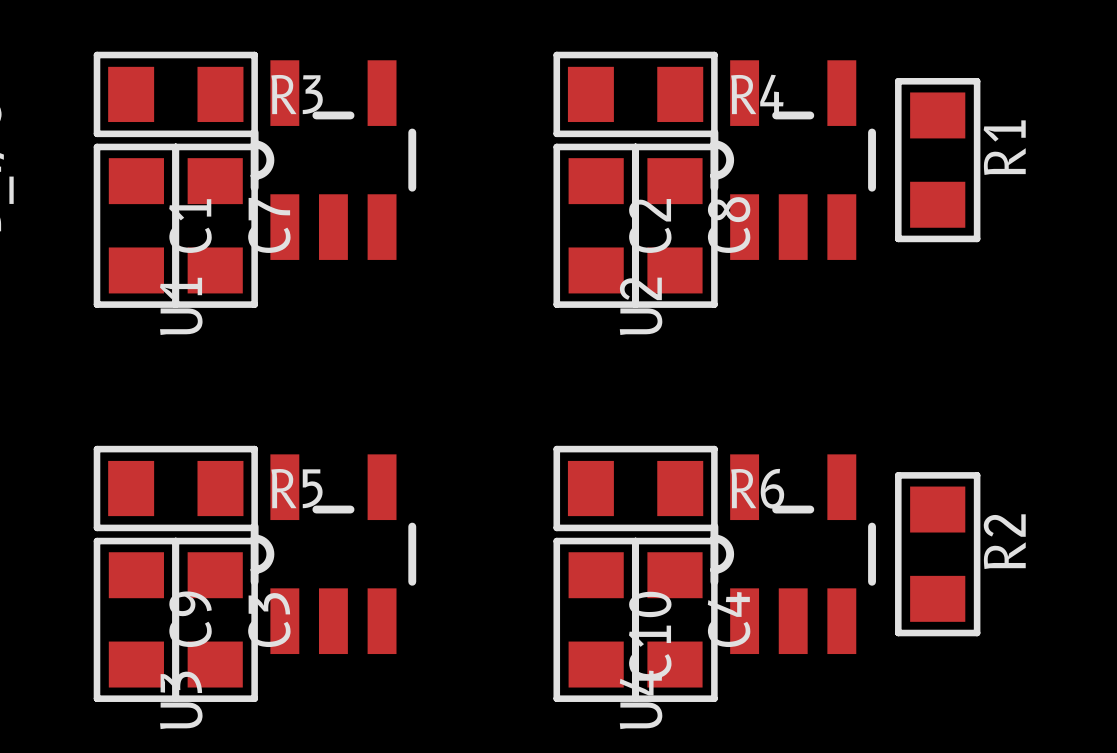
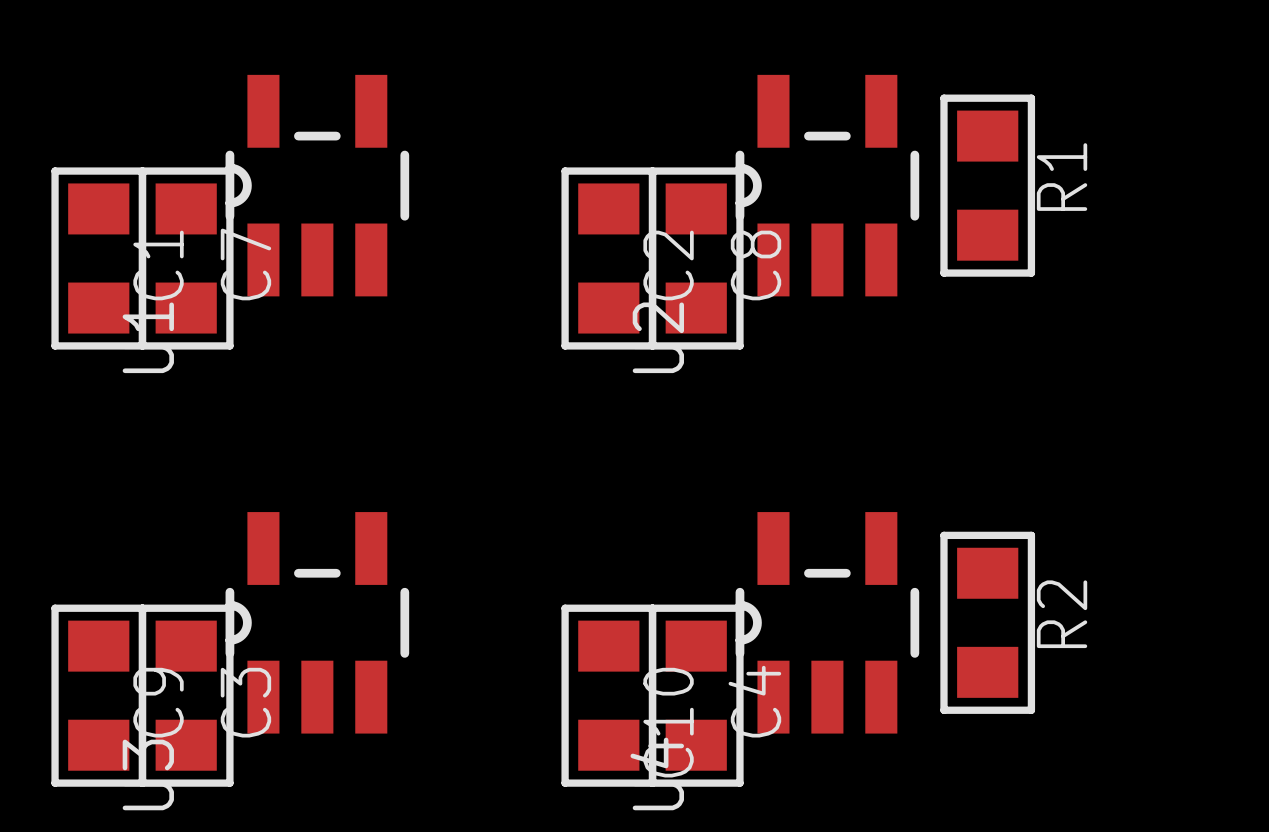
R3: (175, 94) -> none
R4: (635, 94) -> none
R5: (175, 488) -> none
R6: (635, 488) -> none

